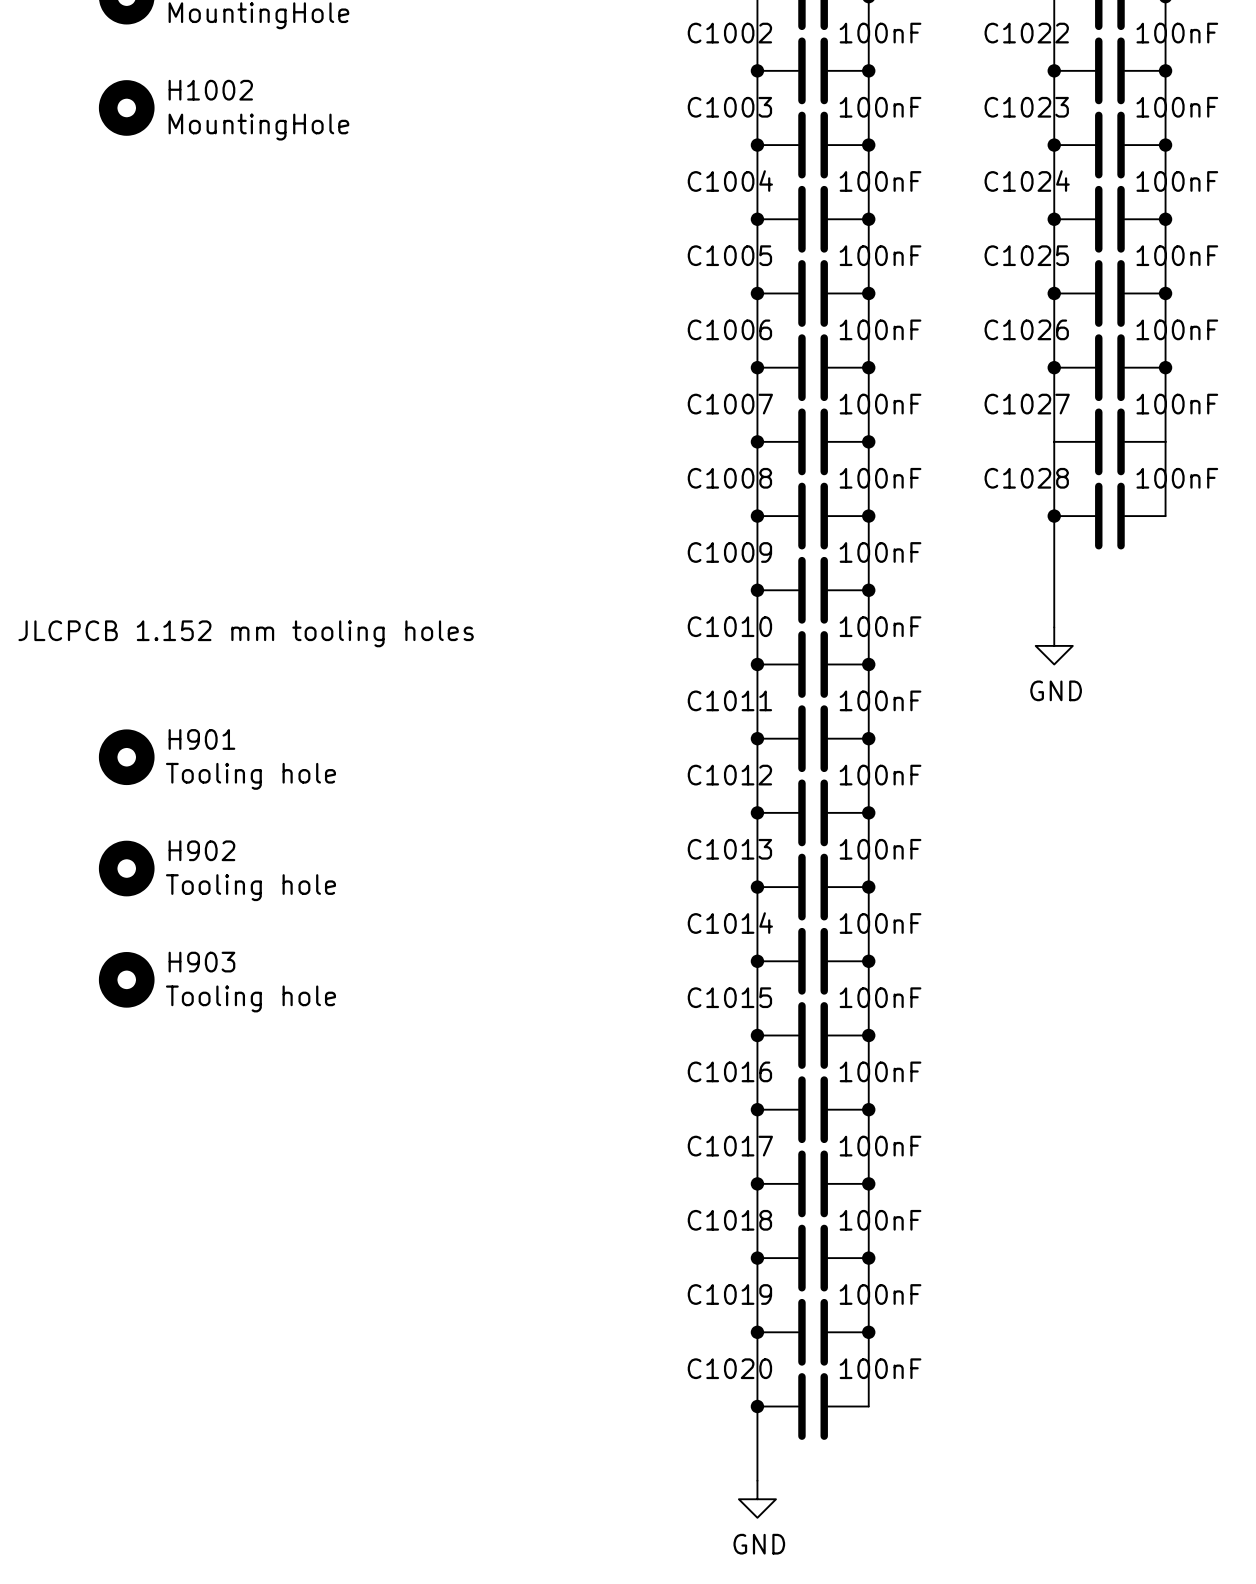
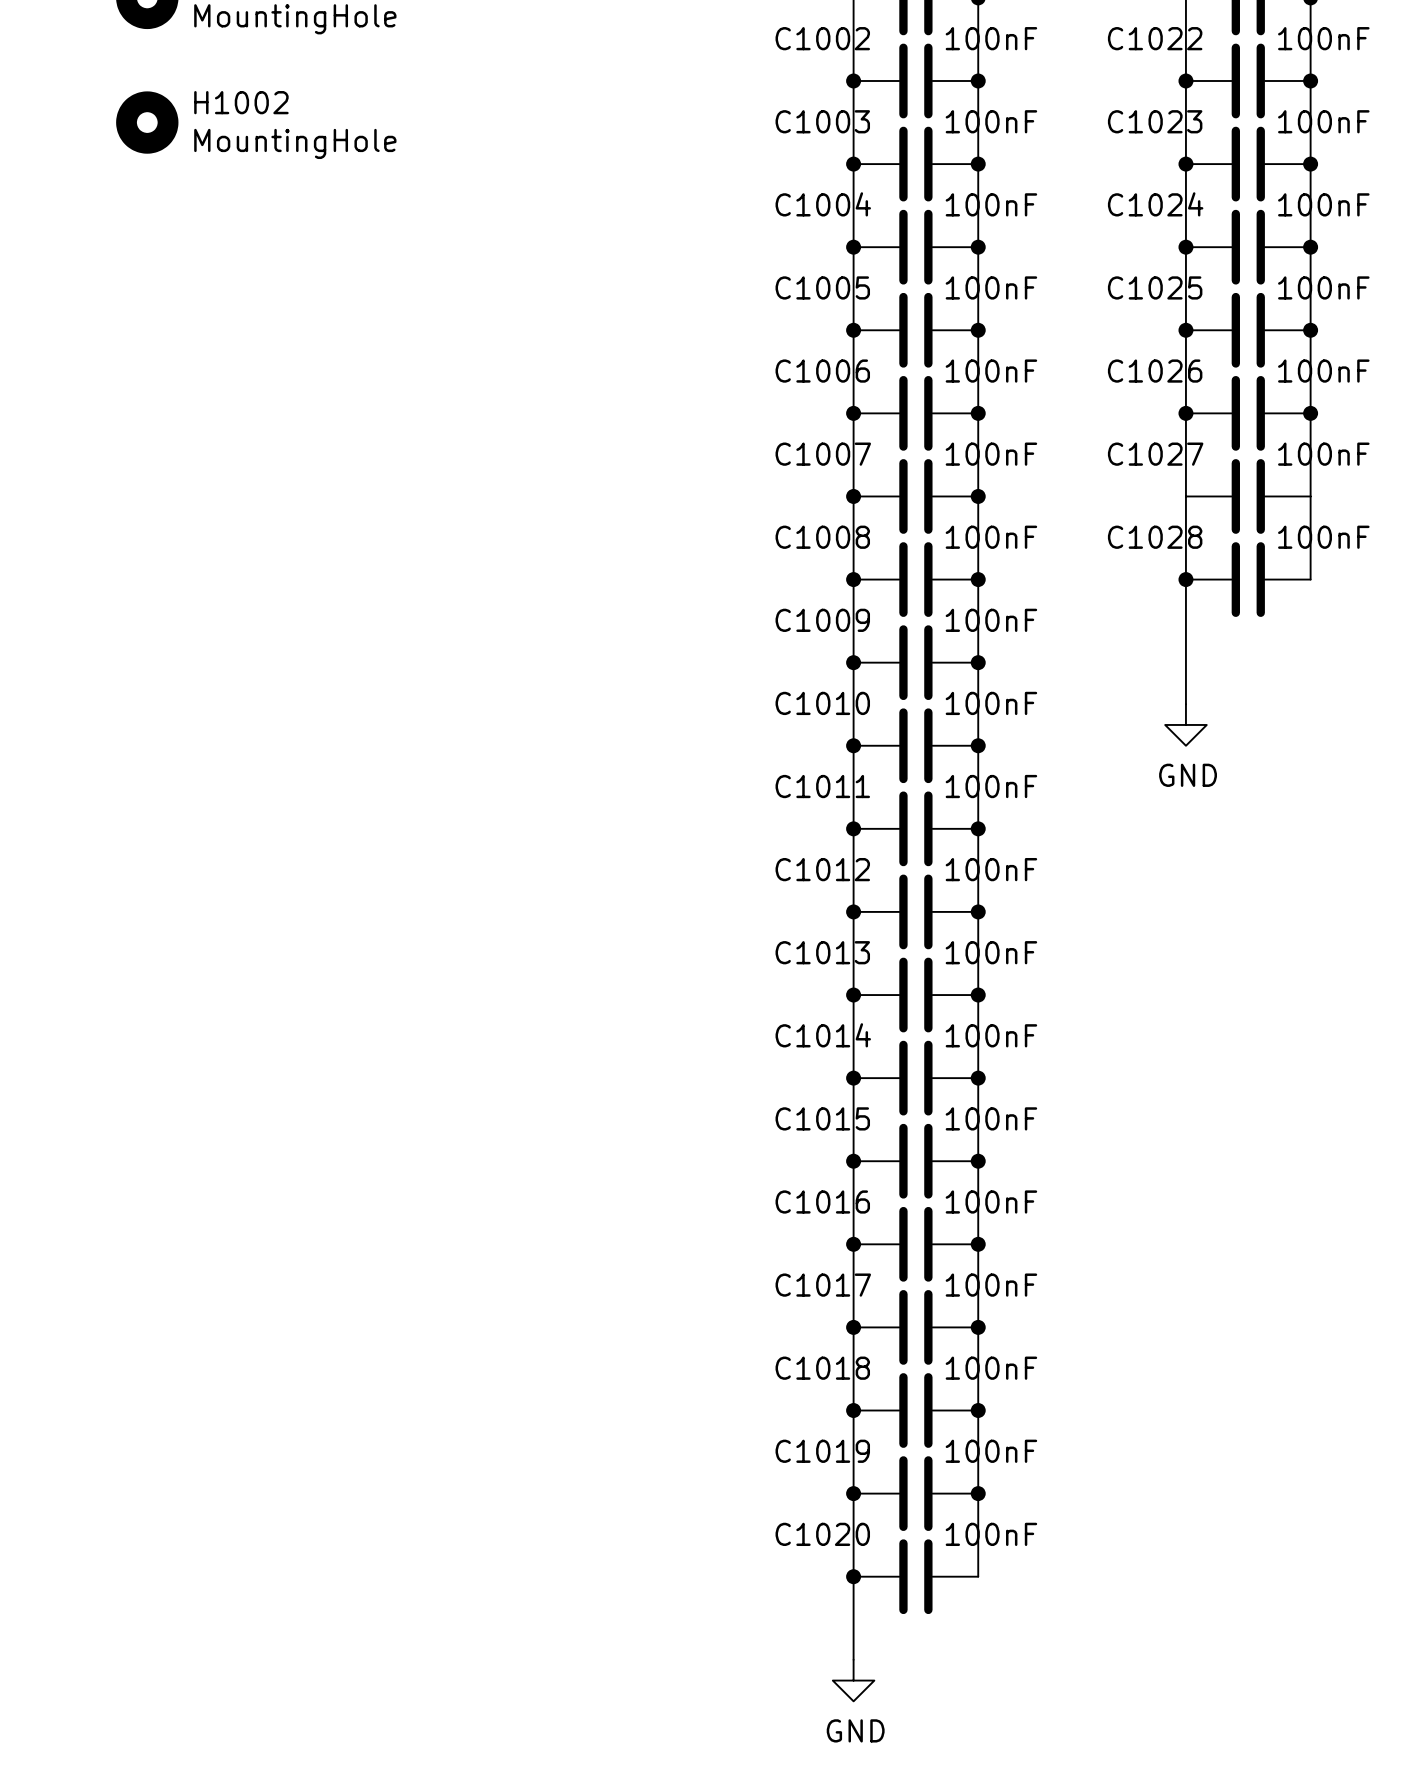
text: JLCPCB 1.152 mm tooling holes (246, 633) -> none
H901: Tooling hole (126, 757) -> none
H902: Tooling hole (126, 868) -> none
H903: Tooling hole (126, 979) -> none

